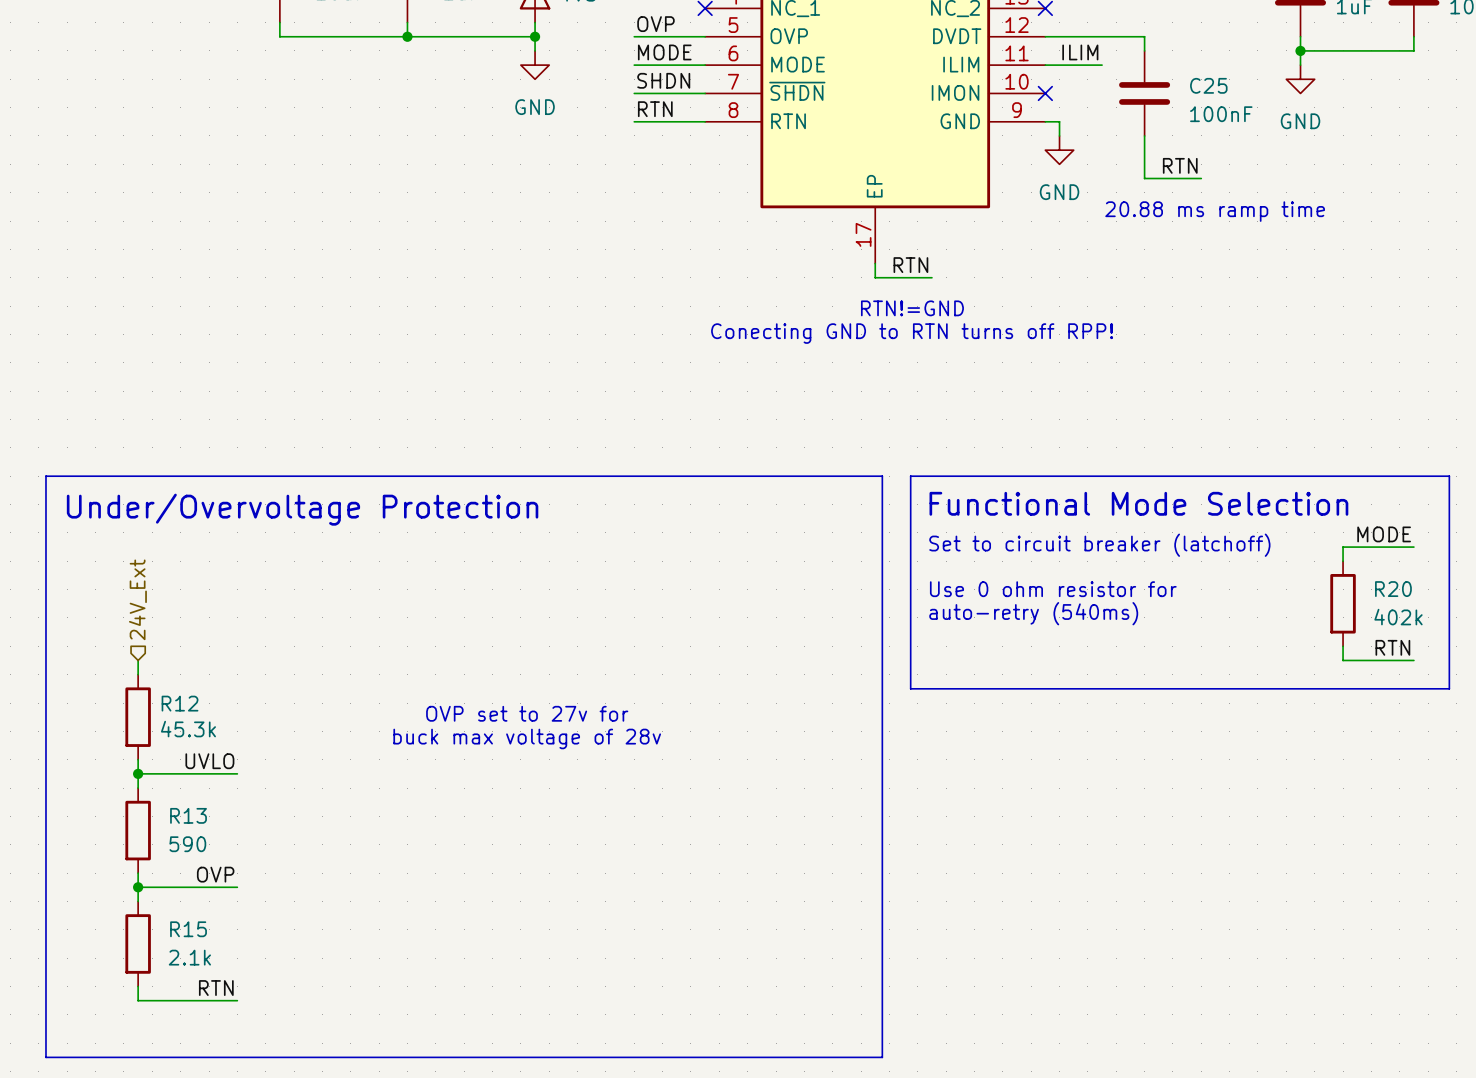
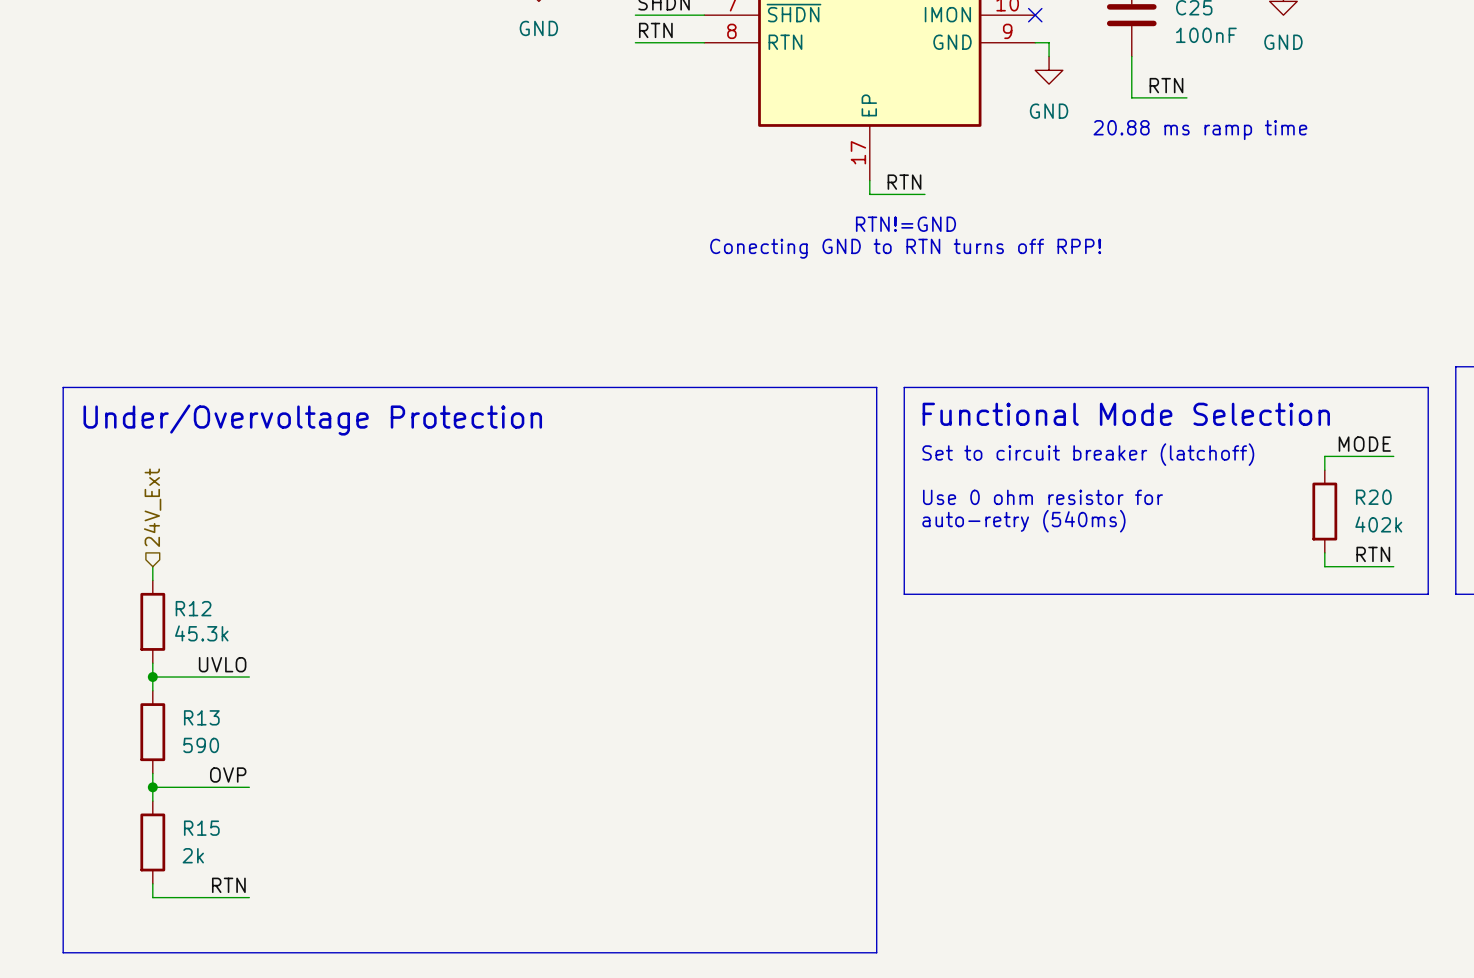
text: OVP set to 27v for (527, 713) -> none
text: buck max voltage of 28v (527, 738) -> none
R15 value: 2.1k (189, 957) -> 2k (193, 855)

